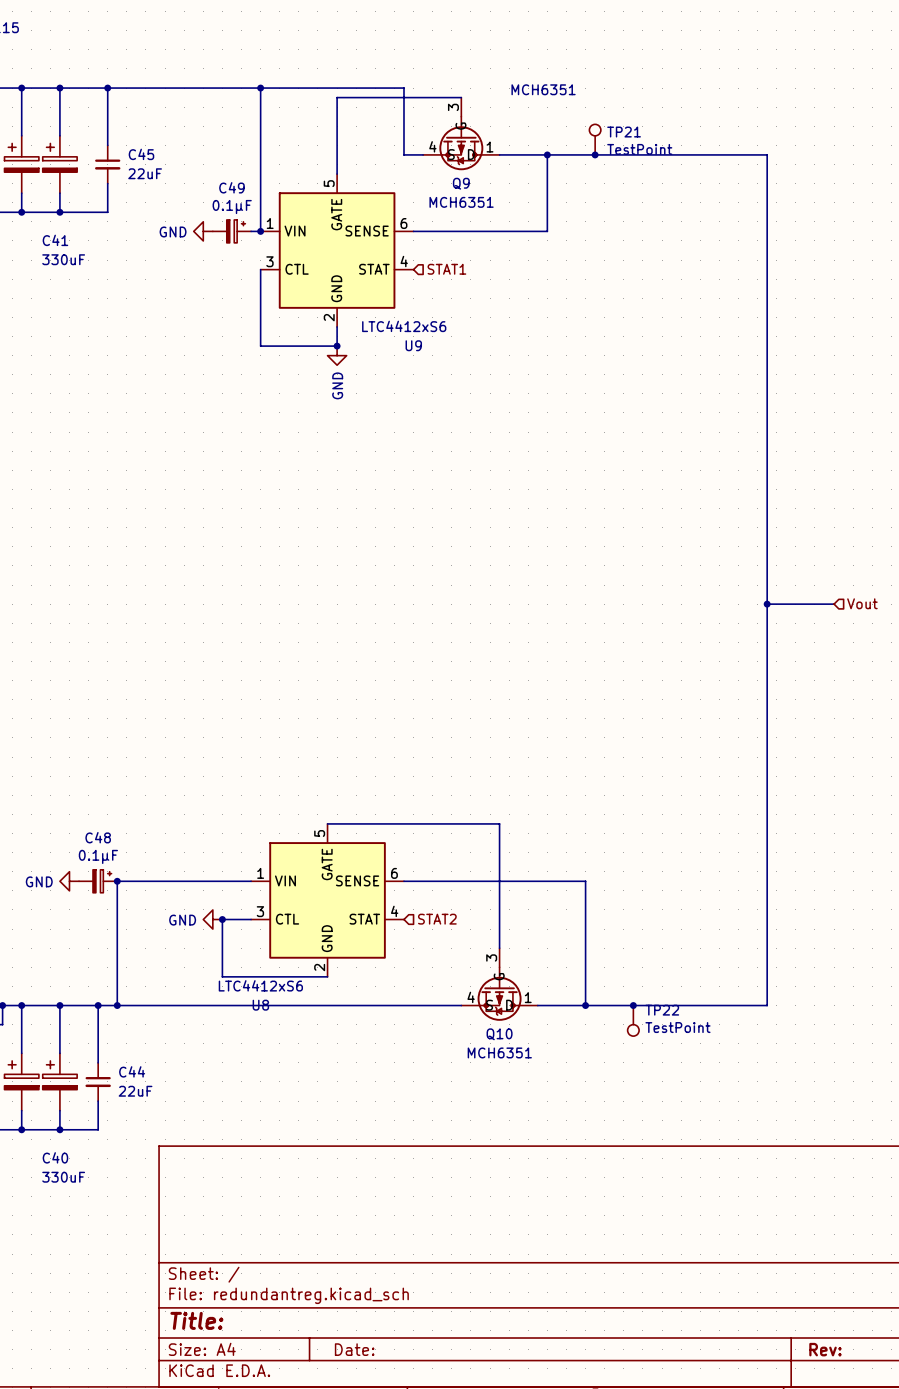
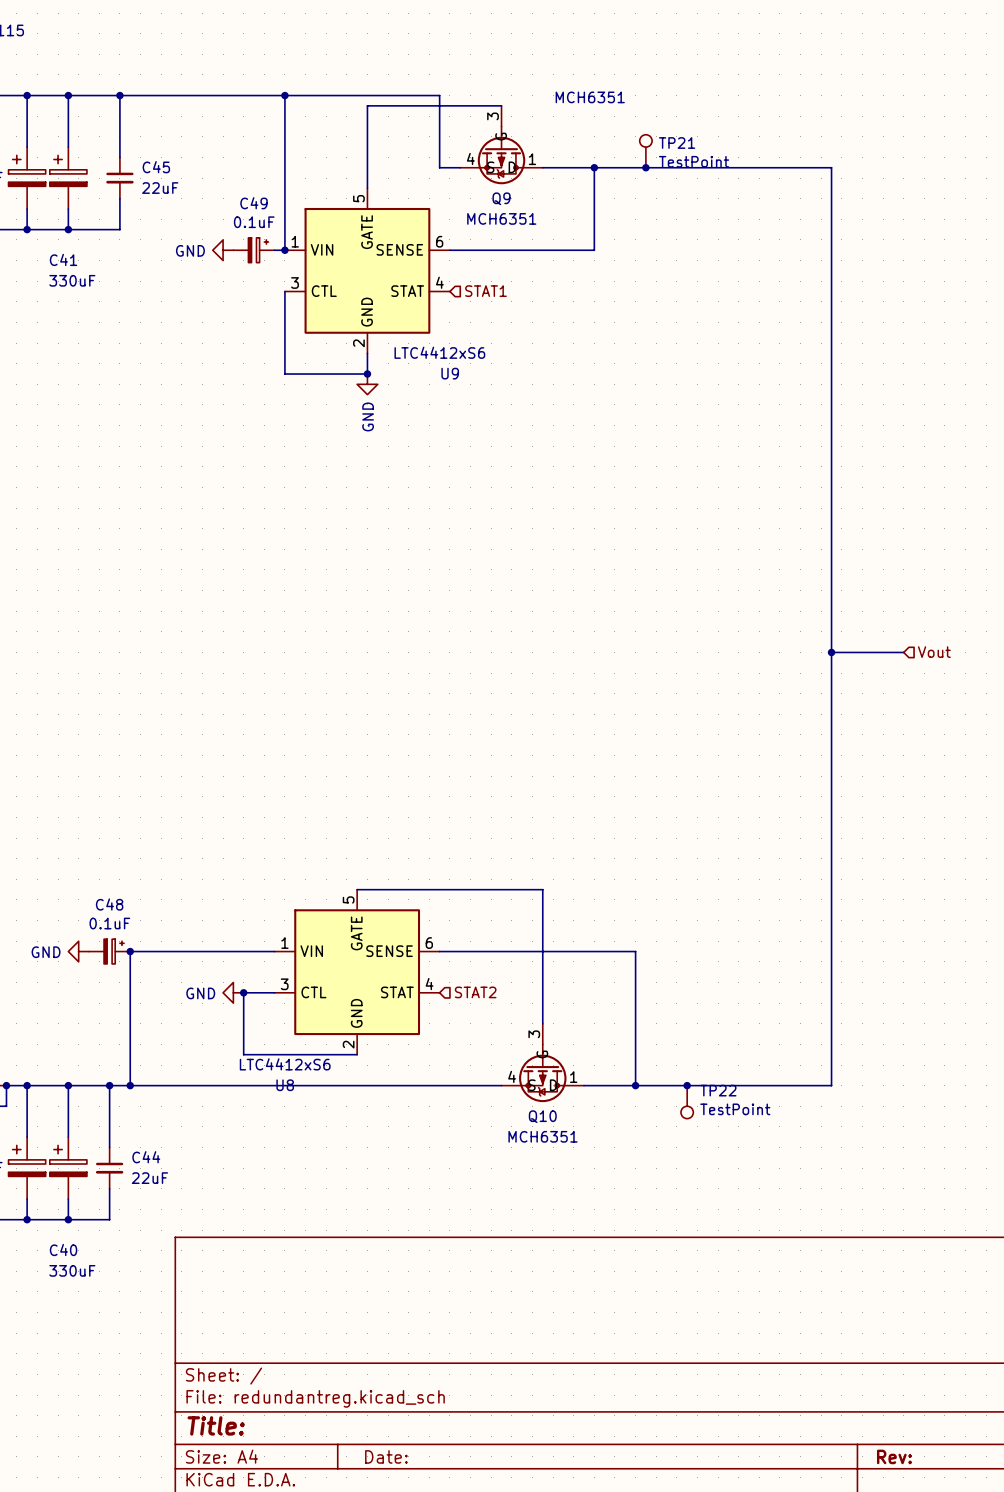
C49 value: 0.1µF (232, 207) -> 0.1uF (254, 222)
C48 value: 0.1µF (98, 856) -> 0.1uF (109, 923)

